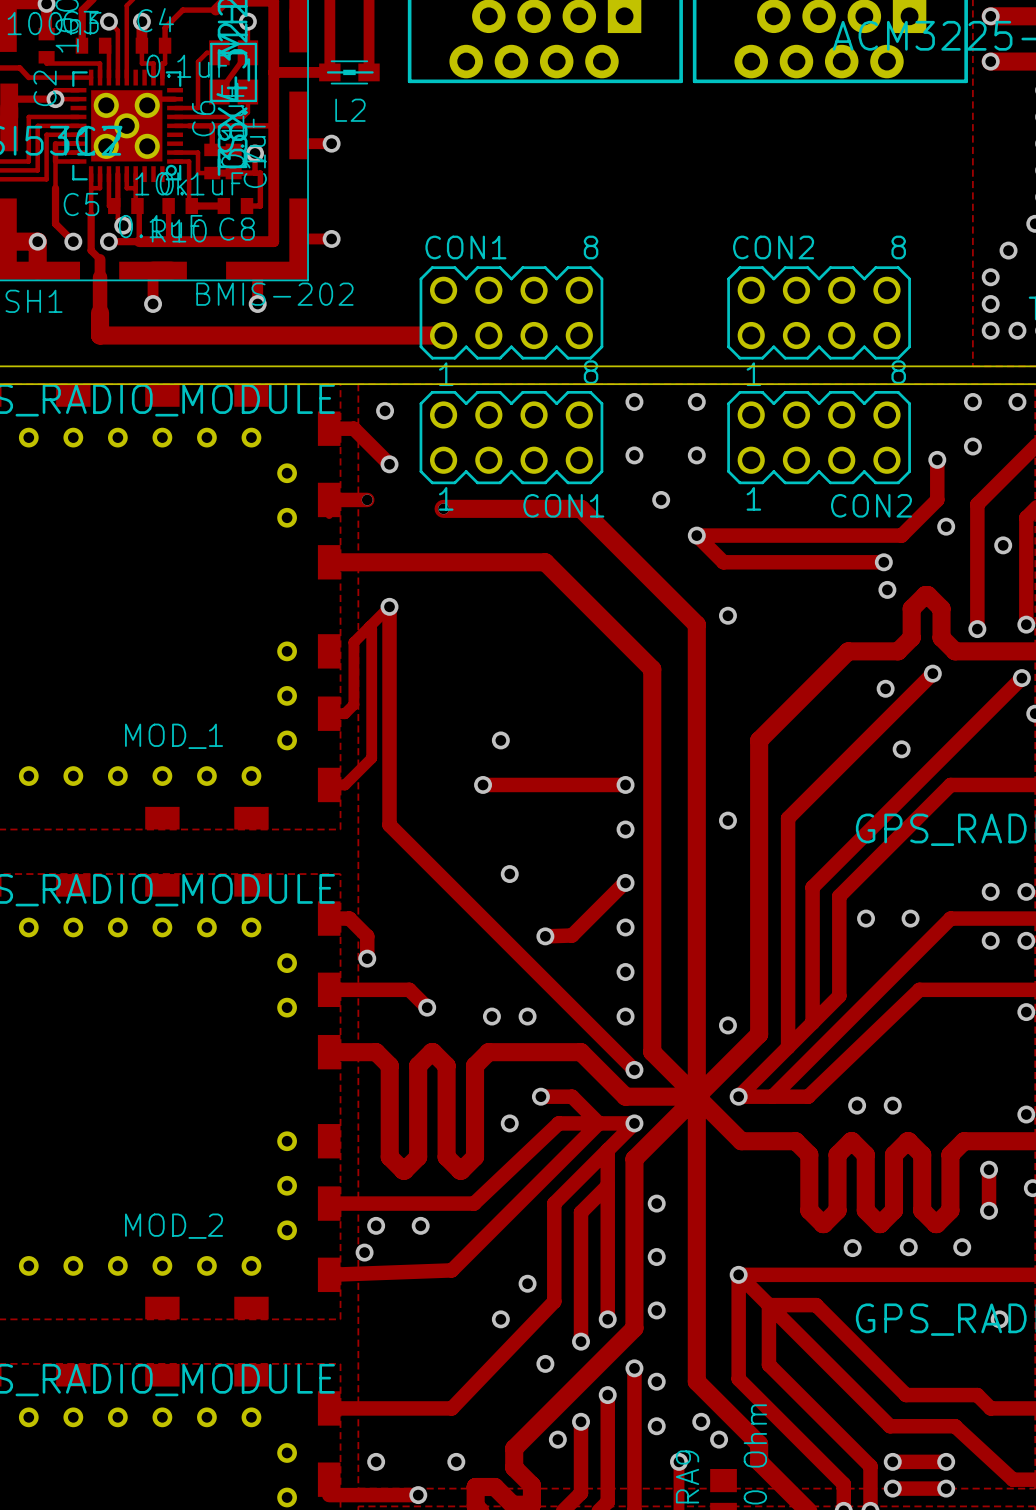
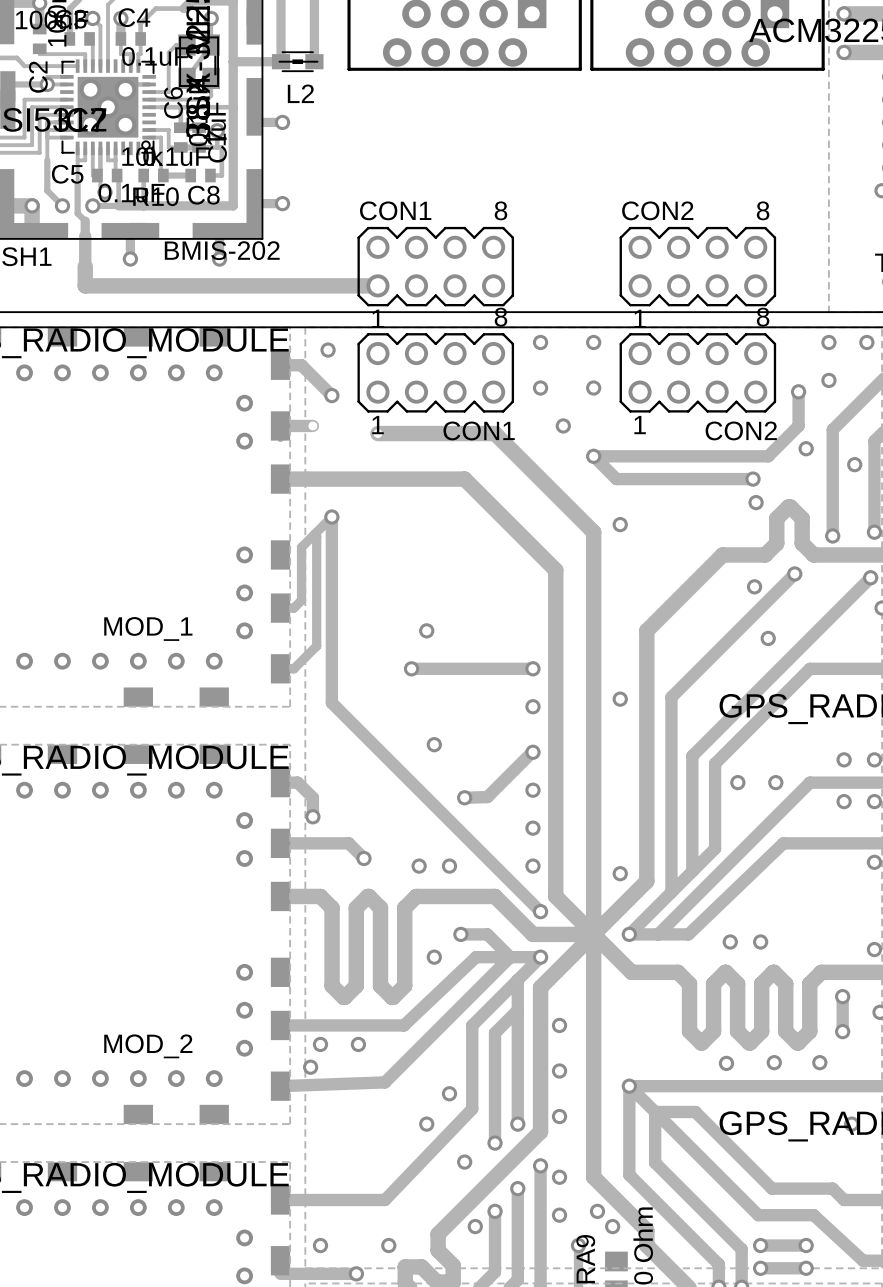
via: (1008, 250) -> none
via: (990, 277) -> none
via: (990, 304) -> none
via: (990, 330) -> none
via: (1017, 330) -> none

